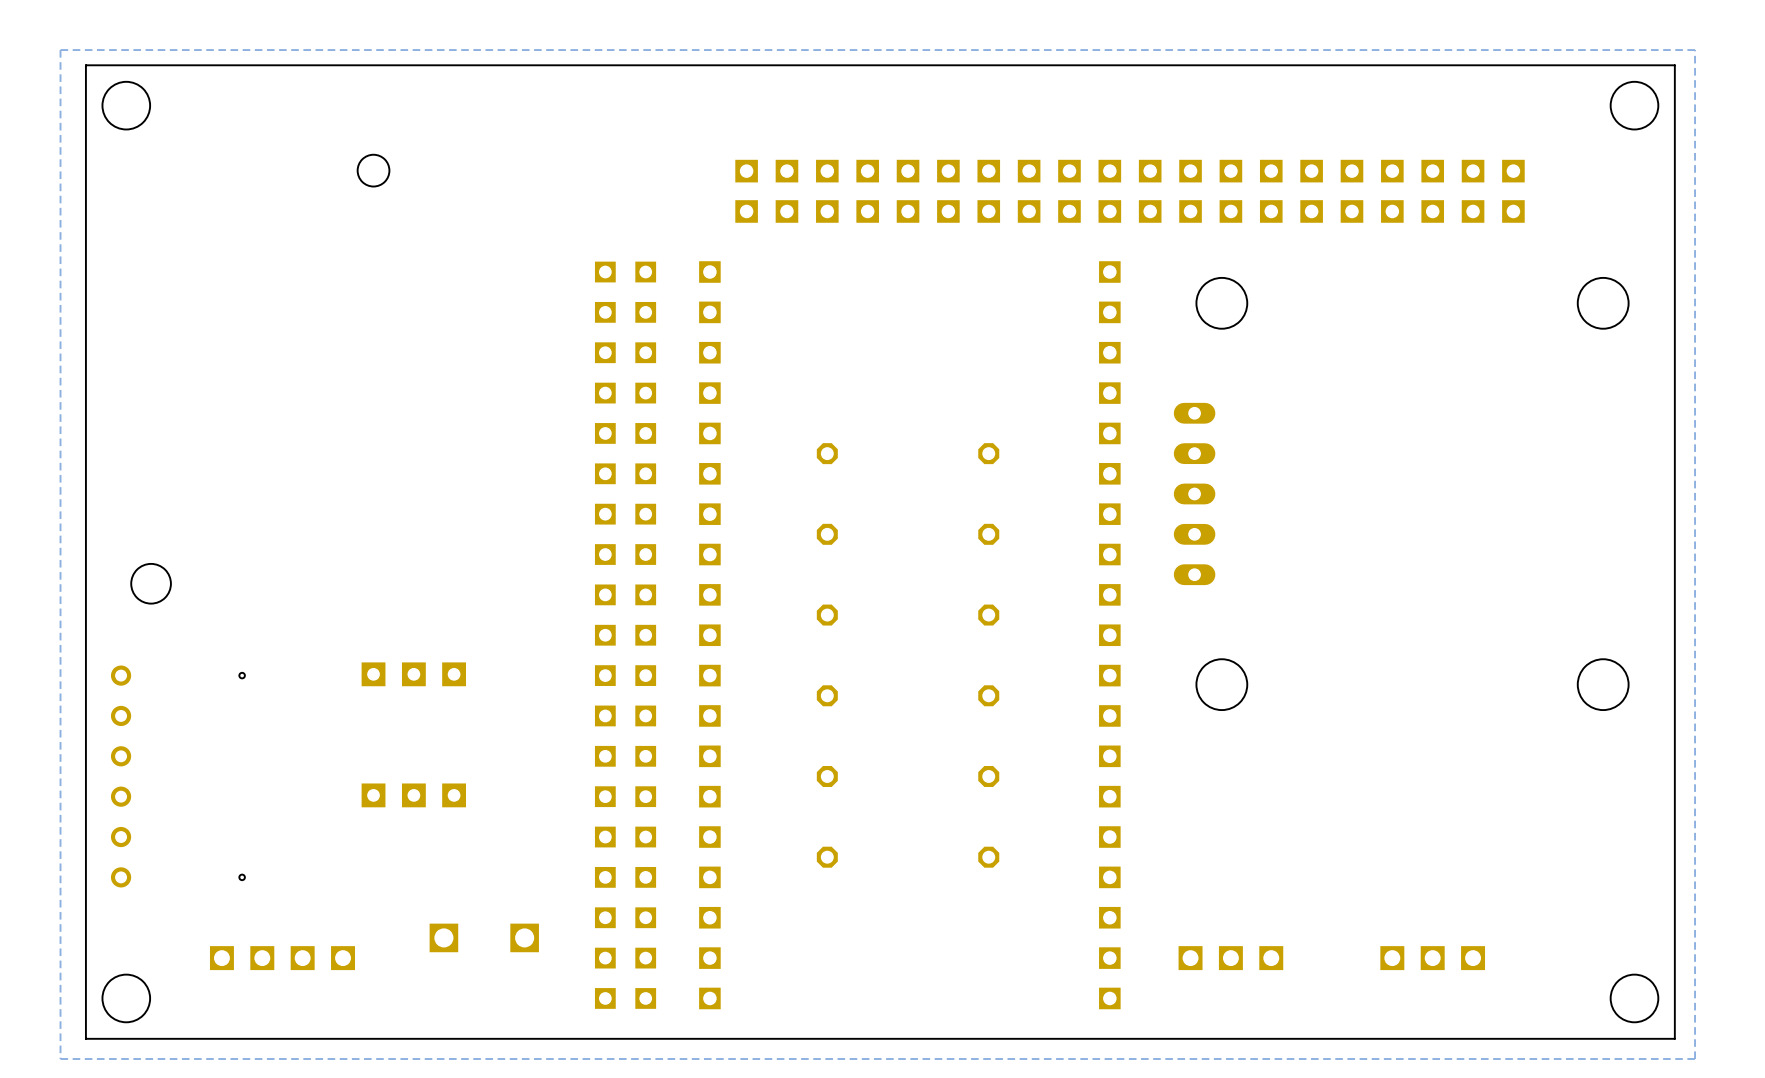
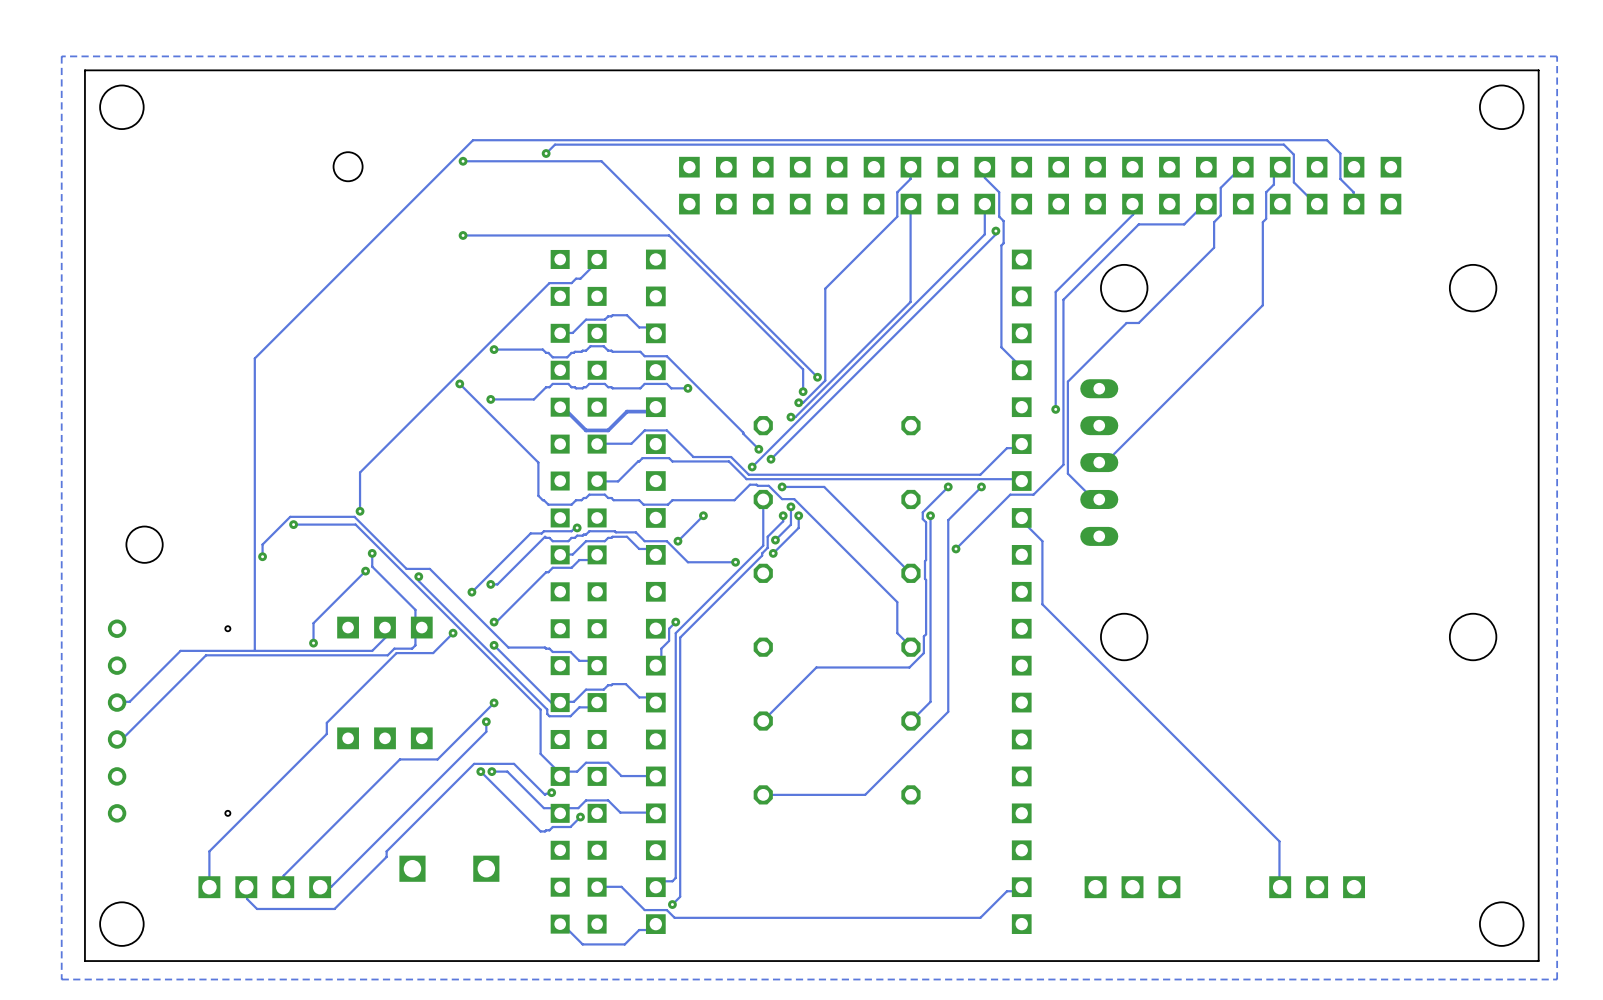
track: none -> (546, 153) (555, 144) (1283, 144) (1293, 154) (1293, 182) (1317, 204)
via: none -> (546, 153)
track: none -> (463, 161) (601, 161) (817, 377)
via: none -> (463, 161)
track: none -> (910, 167) (910, 178) (897, 192) (897, 216) (825, 288) (825, 380) (803, 402) (798, 402)
track: none -> (984, 167) (984, 177) (999, 192) (999, 216) (1003, 221) (1003, 243) (1001, 245) (1001, 347) (1021, 367) (1021, 370)
track: none -> (1243, 167) (1220, 187) (1220, 215) (1214, 222) (1214, 247) (1138, 322) (1126, 322) (1067, 381) (1067, 473) (1093, 499) (1099, 499)
track: none -> (1280, 167) (1273, 173) (1273, 184) (1266, 192) (1266, 218) (1262, 222) (1262, 305) (1105, 462) (1099, 462)
track: none -> (910, 204) (910, 301) (795, 417) (790, 417)
track: none -> (984, 204) (984, 234) (752, 466)
track: none -> (1132, 204) (1133, 214) (1055, 291) (1055, 409)
track: none -> (1206, 204) (1184, 224) (1138, 224) (1063, 299) (1063, 464) (1033, 494) (1010, 494) (956, 548)
track: none -> (1354, 204) (1353, 192) (1340, 178) (1340, 153) (1327, 140) (473, 140) (254, 358) (254, 650)
track: none -> (995, 231) (995, 234) (771, 459)
via: none -> (995, 231)
track: none -> (463, 235) (669, 235) (803, 369) (803, 391)
via: none -> (463, 235)
track: none -> (597, 259) (597, 262) (580, 278) (576, 278) (571, 283) (549, 283) (360, 472) (360, 511)
track: none -> (655, 333) (650, 327) (639, 327) (627, 315) (612, 315) (604, 319) (586, 319) (572, 332) (560, 333)
track: none -> (494, 349) (542, 349) (552, 357) (567, 357) (571, 352) (586, 350) (590, 346) (603, 346) (612, 351) (640, 351) (644, 356) (666, 356) (758, 449)
via: none -> (494, 349)
via: none -> (817, 377)
track: none -> (459, 383) (538, 462) (538, 495) (548, 504) (571, 504) (576, 500) (581, 500) (589, 494) (604, 494) (613, 500) (639, 500) (643, 504) (667, 504) (672, 500) (734, 500) (749, 484) (768, 485) (782, 499) (794, 499) (897, 602) (897, 633) (910, 647)
via: none -> (459, 383)
track: none -> (687, 388) (671, 388) (666, 383) (644, 383) (640, 388) (612, 388) (604, 383) (589, 383) (586, 387) (576, 388) (568, 383) (552, 383) (546, 387) (533, 399) (490, 399)
via: none -> (687, 388)
via: none -> (803, 391)
via: none -> (490, 399)
via: none -> (798, 402)
track: none -> (655, 407) (651, 411) (627, 411) (608, 430) (586, 430) (562, 407) (560, 407)
via: none -> (1055, 409)
via: none -> (790, 417)
track: none -> (1021, 444) (1018, 448) (1006, 448) (980, 474) (748, 474) (731, 457) (693, 457) (666, 430) (644, 430) (631, 443) (597, 444)
via: none -> (758, 449)
via: none -> (771, 459)
via: none -> (752, 466)
track: none -> (1021, 481) (1020, 479) (746, 479) (728, 461) (672, 461) (669, 458) (642, 458) (618, 481) (597, 481)
track: none -> (782, 486) (824, 486) (910, 573)
via: none -> (782, 486)
track: none -> (948, 486) (922, 512) (922, 519) (926, 522) (926, 634) (923, 636) (923, 653) (909, 667) (816, 667) (763, 721)
via: none -> (948, 486)
track: none -> (981, 486) (948, 520) (948, 711) (865, 794) (763, 794)
via: none -> (981, 486)
track: none -> (763, 499) (763, 545) (675, 633) (675, 877) (672, 881) (662, 881) (655, 887)
track: none -> (790, 506) (790, 524) (775, 540)
via: none -> (790, 506)
via: none -> (360, 511)
track: none -> (703, 515) (677, 541)
via: none -> (703, 515)
track: none -> (783, 515) (783, 521) (767, 536) (767, 547) (762, 555) (680, 637) (680, 896) (672, 904)
via: none -> (783, 515)
track: none -> (798, 515) (798, 527) (773, 553)
via: none -> (798, 515)
track: none -> (930, 515) (930, 701) (910, 721)
via: none -> (930, 515)
track: none -> (1021, 517) (1022, 521) (1042, 541) (1042, 604) (1279, 841) (1280, 887)
track: none -> (293, 524) (355, 524) (540, 709) (540, 753) (559, 772) (559, 776) (560, 776) (559, 771) (577, 771) (586, 762) (608, 762) (621, 776) (655, 776)
via: none -> (293, 524)
track: none -> (577, 527) (571, 531) (530, 533) (471, 592)
via: none -> (577, 527)
via: none -> (775, 540)
via: none -> (677, 541)
via: none -> (956, 548)
track: none -> (372, 553) (372, 566) (415, 609) (415, 620) (421, 627) (415, 633) (415, 645) (412, 648) (394, 648) (387, 655) (206, 655) (121, 739) (117, 739)
via: none -> (372, 553)
via: none -> (773, 553)
track: none -> (597, 554) (592, 560) (579, 560) (571, 567) (552, 567) (496, 622) (494, 622)
track: none -> (655, 554) (650, 548) (639, 548) (627, 536) (612, 536) (604, 541) (586, 541) (572, 554) (560, 554)
track: none -> (262, 556) (262, 544) (290, 516) (354, 516) (406, 568) (429, 568) (508, 647) (545, 647) (552, 651) (570, 651) (579, 660) (592, 660) (597, 665)
via: none -> (262, 556)
track: none -> (735, 562) (687, 562) (666, 541) (644, 541) (635, 532) (589, 531) (586, 534) (577, 535) (568, 541) (552, 541) (545, 536) (497, 584) (490, 584)
via: none -> (735, 562)
track: none -> (365, 571) (313, 623) (313, 643)
via: none -> (365, 571)
track: none -> (418, 576) (418, 581) (547, 709) (549, 716) (570, 716) (579, 707) (592, 707) (597, 702)
via: none -> (418, 576)
via: none -> (490, 584)
via: none -> (471, 592)
via: none -> (494, 622)
track: none -> (675, 622) (669, 628) (669, 640) (661, 648) (661, 660) (655, 665)
via: none -> (675, 622)
track: none -> (385, 627) (385, 637) (372, 650) (180, 650) (129, 701) (117, 702)
track: none -> (453, 633) (433, 653) (396, 653) (326, 722) (326, 733) (209, 851) (209, 887)
via: none -> (453, 633)
via: none -> (313, 643)
track: none -> (494, 645) (551, 702) (573, 701) (586, 689) (603, 689) (612, 684) (625, 684) (639, 697) (651, 697) (655, 702)
via: none -> (494, 645)
track: none -> (494, 702) (437, 759) (399, 759) (283, 875) (283, 887)
via: none -> (494, 702)
track: none -> (486, 721) (486, 731) (331, 886) (320, 887)
via: none -> (486, 721)
track: none -> (480, 771) (540, 831) (549, 830) (552, 827) (570, 827) (580, 817)
via: none -> (480, 771)
track: none -> (491, 771) (507, 771) (543, 808) (555, 808) (560, 813) (564, 808) (578, 808) (586, 800) (608, 800) (620, 812) (655, 813)
via: none -> (491, 771)
track: none -> (551, 792) (545, 794) (514, 763) (474, 763) (386, 851) (386, 856) (334, 908) (257, 908) (247, 899) (246, 887)
via: none -> (551, 792)
via: none -> (580, 817)
track: none -> (1021, 887) (1018, 891) (1006, 891) (980, 917) (674, 917) (666, 910) (644, 910) (621, 886) (597, 887)
via: none -> (672, 904)
track: none -> (655, 924) (650, 930) (639, 930) (624, 944) (582, 944) (560, 924)

